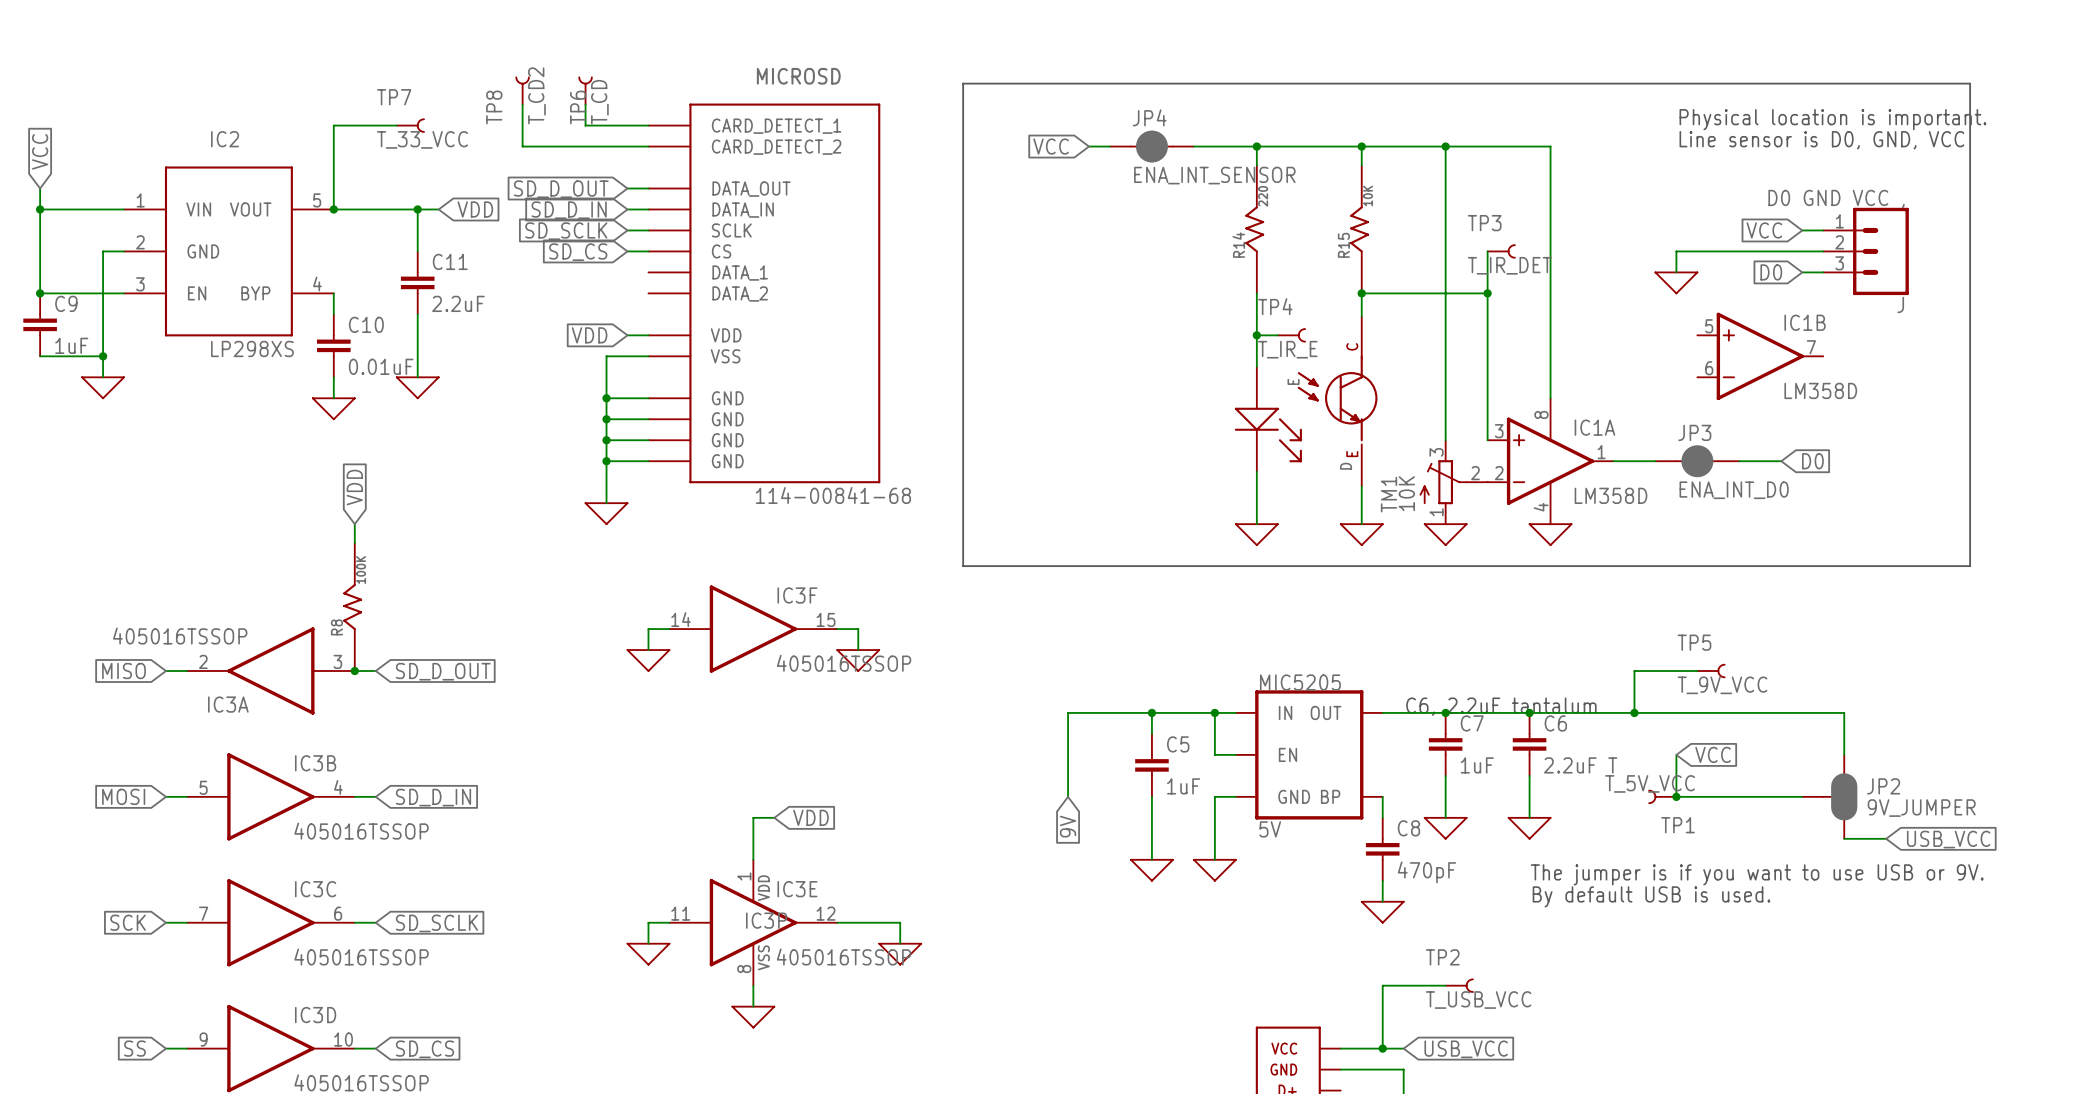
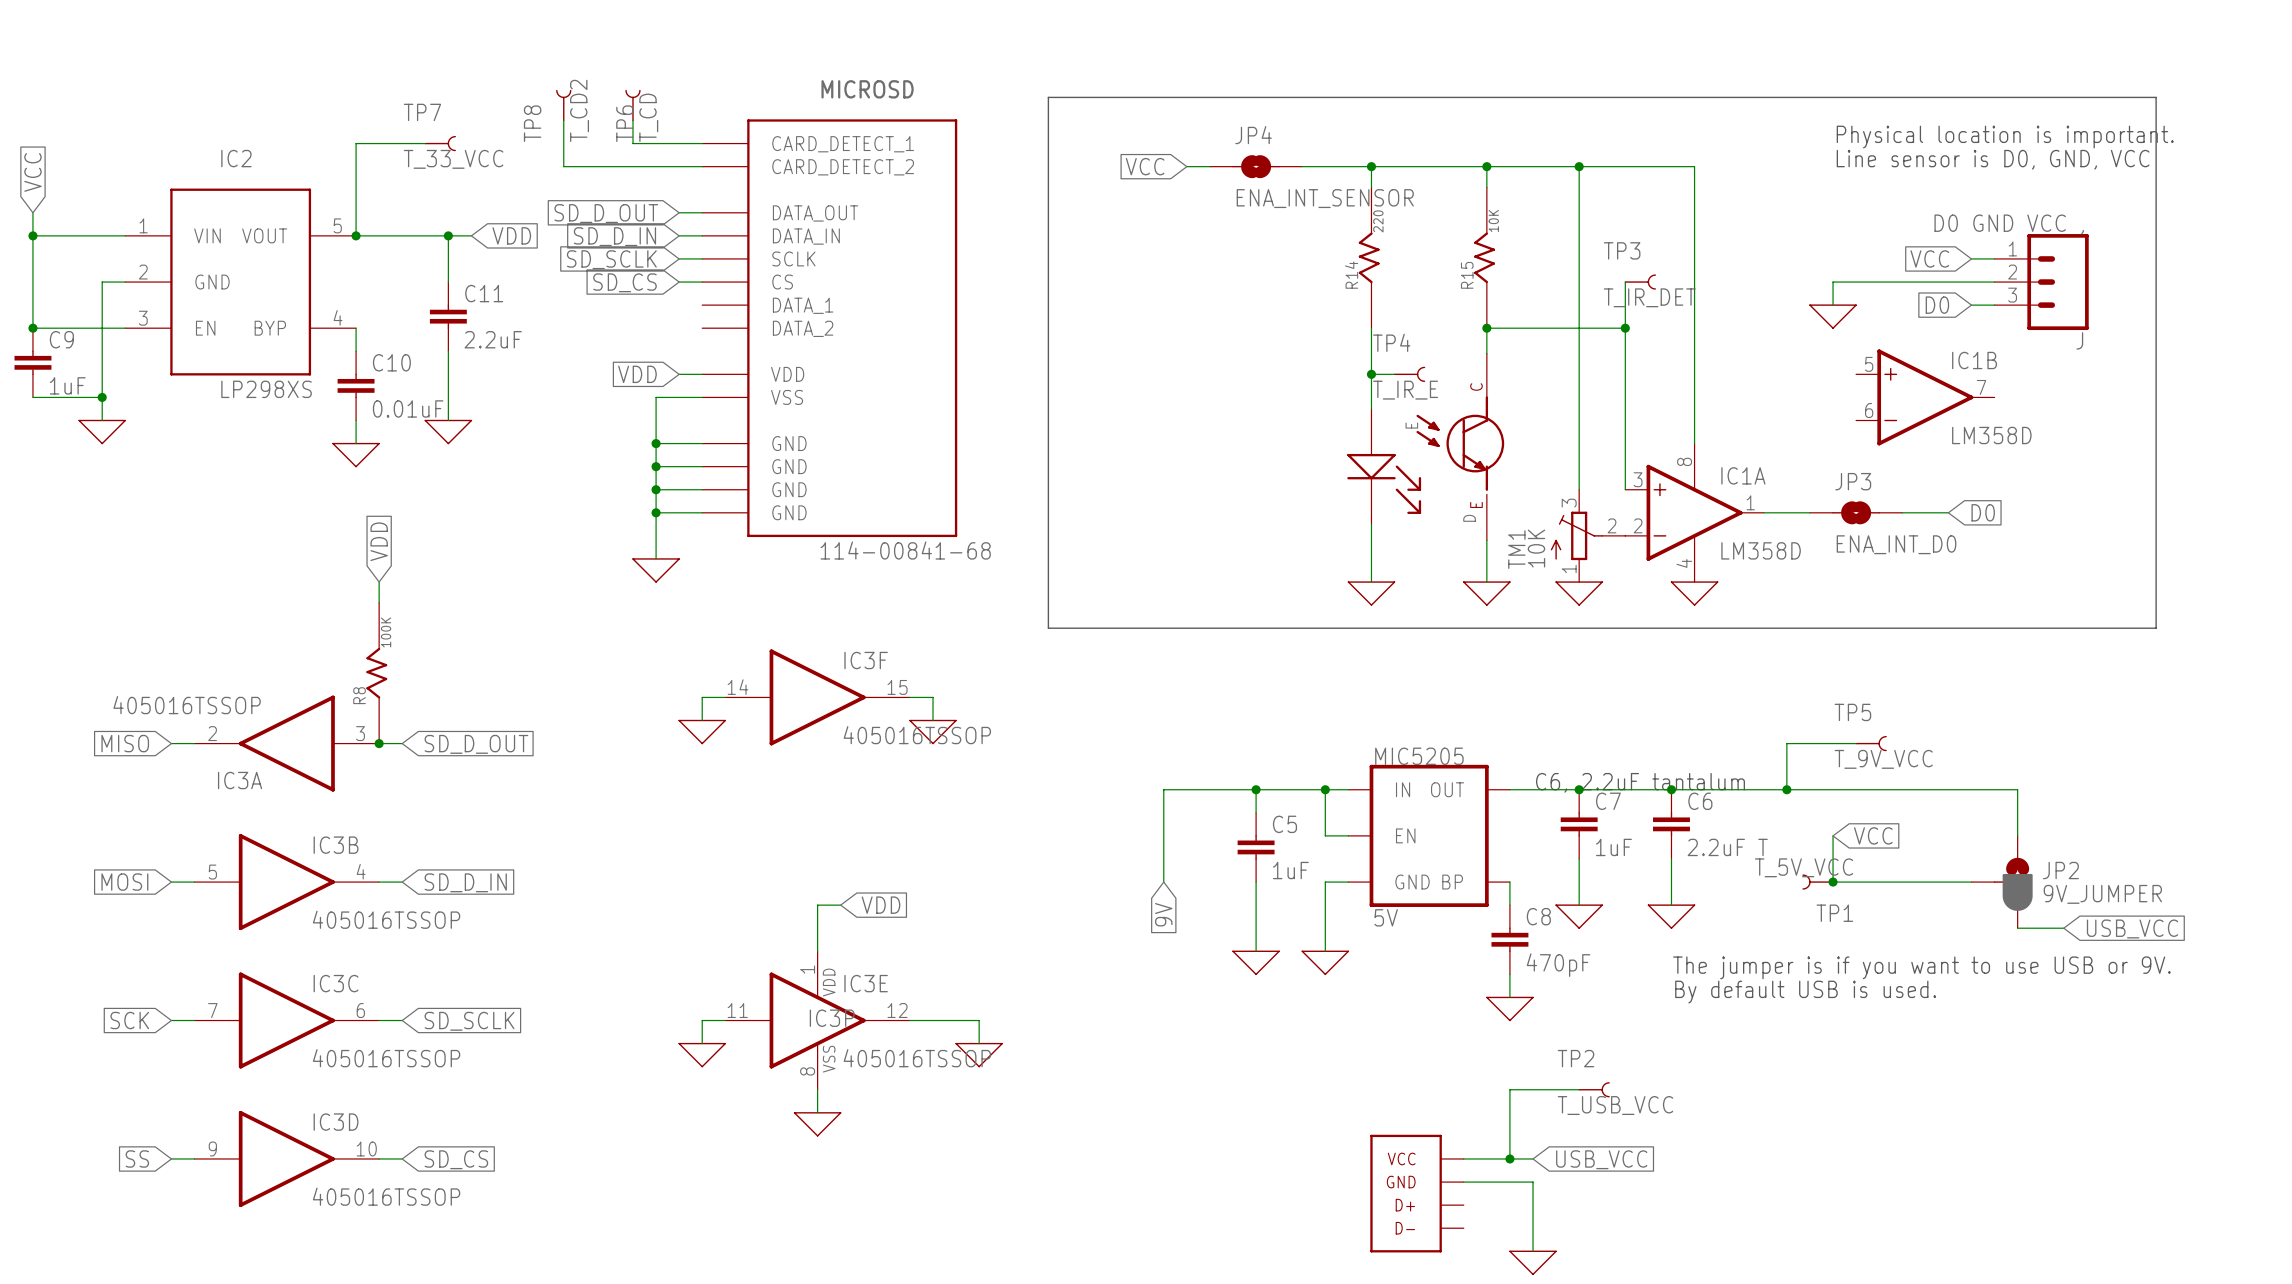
JP4 symbol: [1110, 130, 1194, 163] -> [1209, 155, 1303, 179]
JP3 symbol: [1655, 445, 1740, 478] -> [1809, 501, 1903, 525]
JP2 symbol: [1802, 754, 1858, 839] -> [1971, 835, 2033, 929]

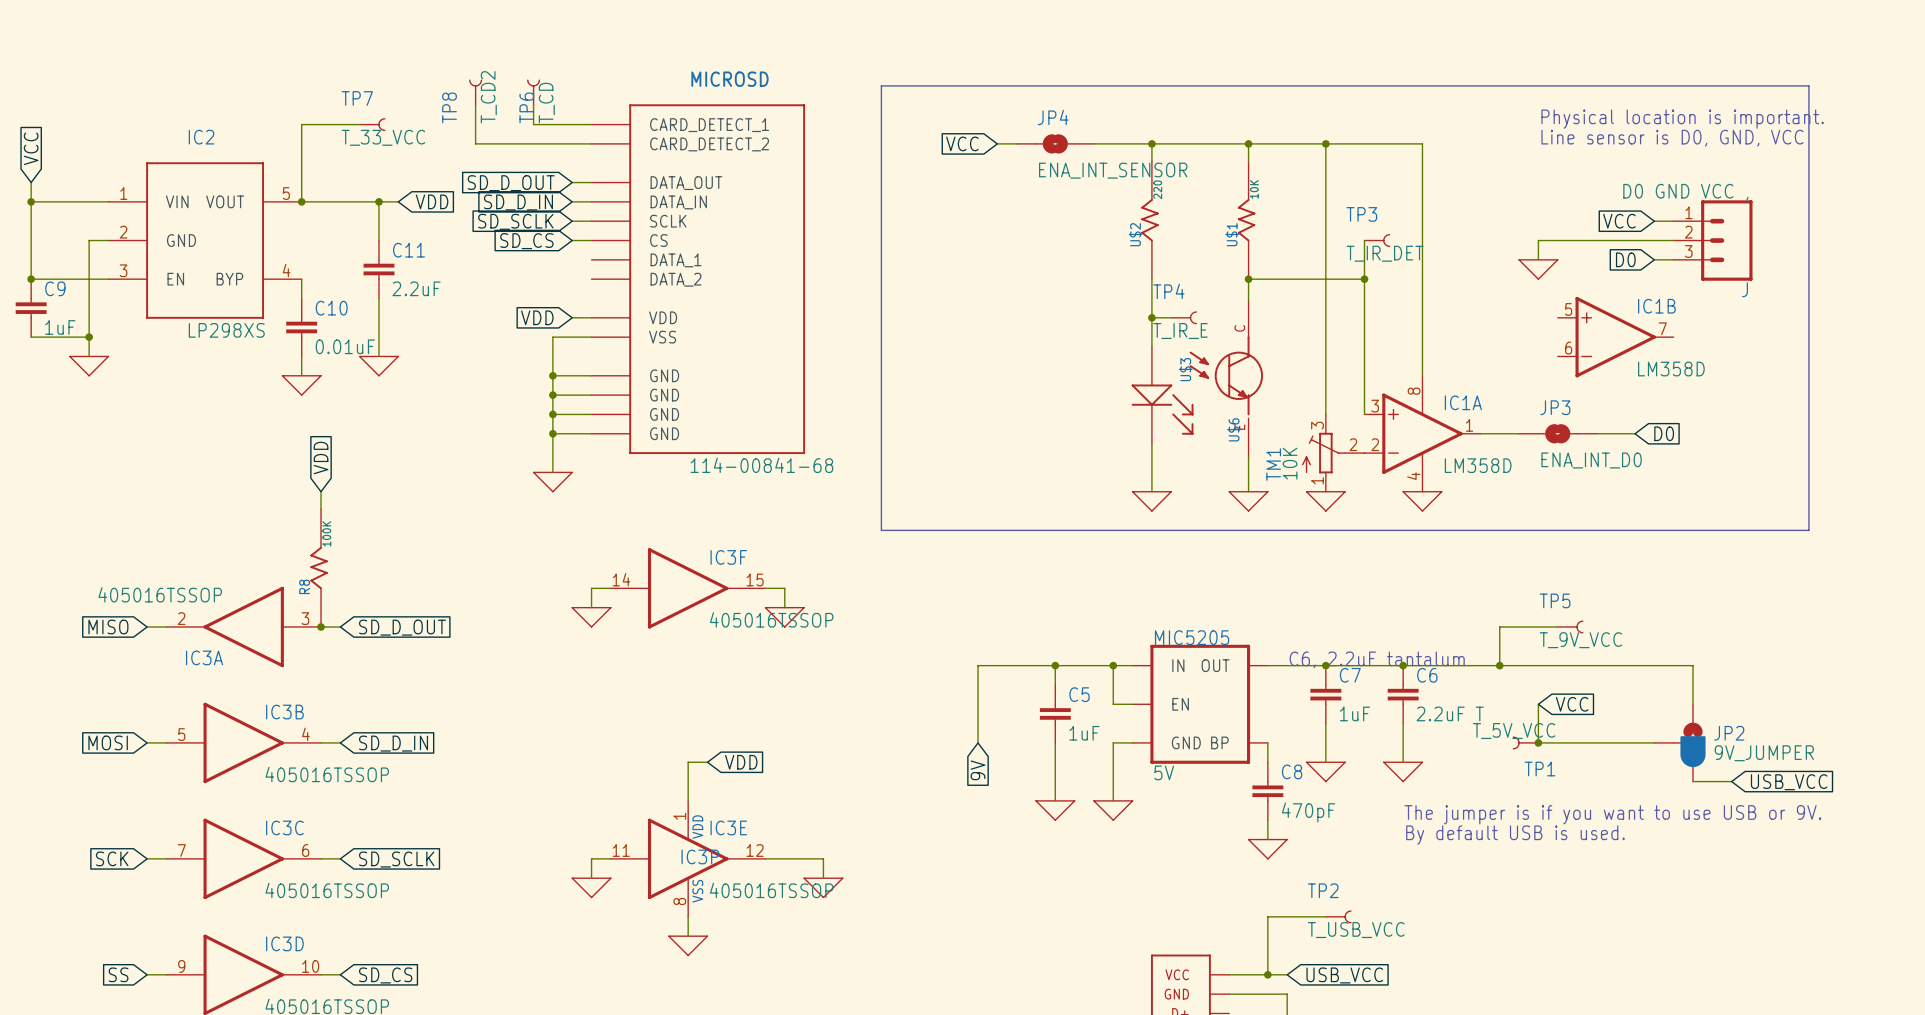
R14 name: R14 (1351, 275) -> U$2 (1135, 234)
R15 name: R15 (1467, 275) -> U$1 (1232, 234)
E name: E (1411, 425) -> U$3 (1185, 369)
D name: D (1469, 518) -> U$6 (1234, 429)

